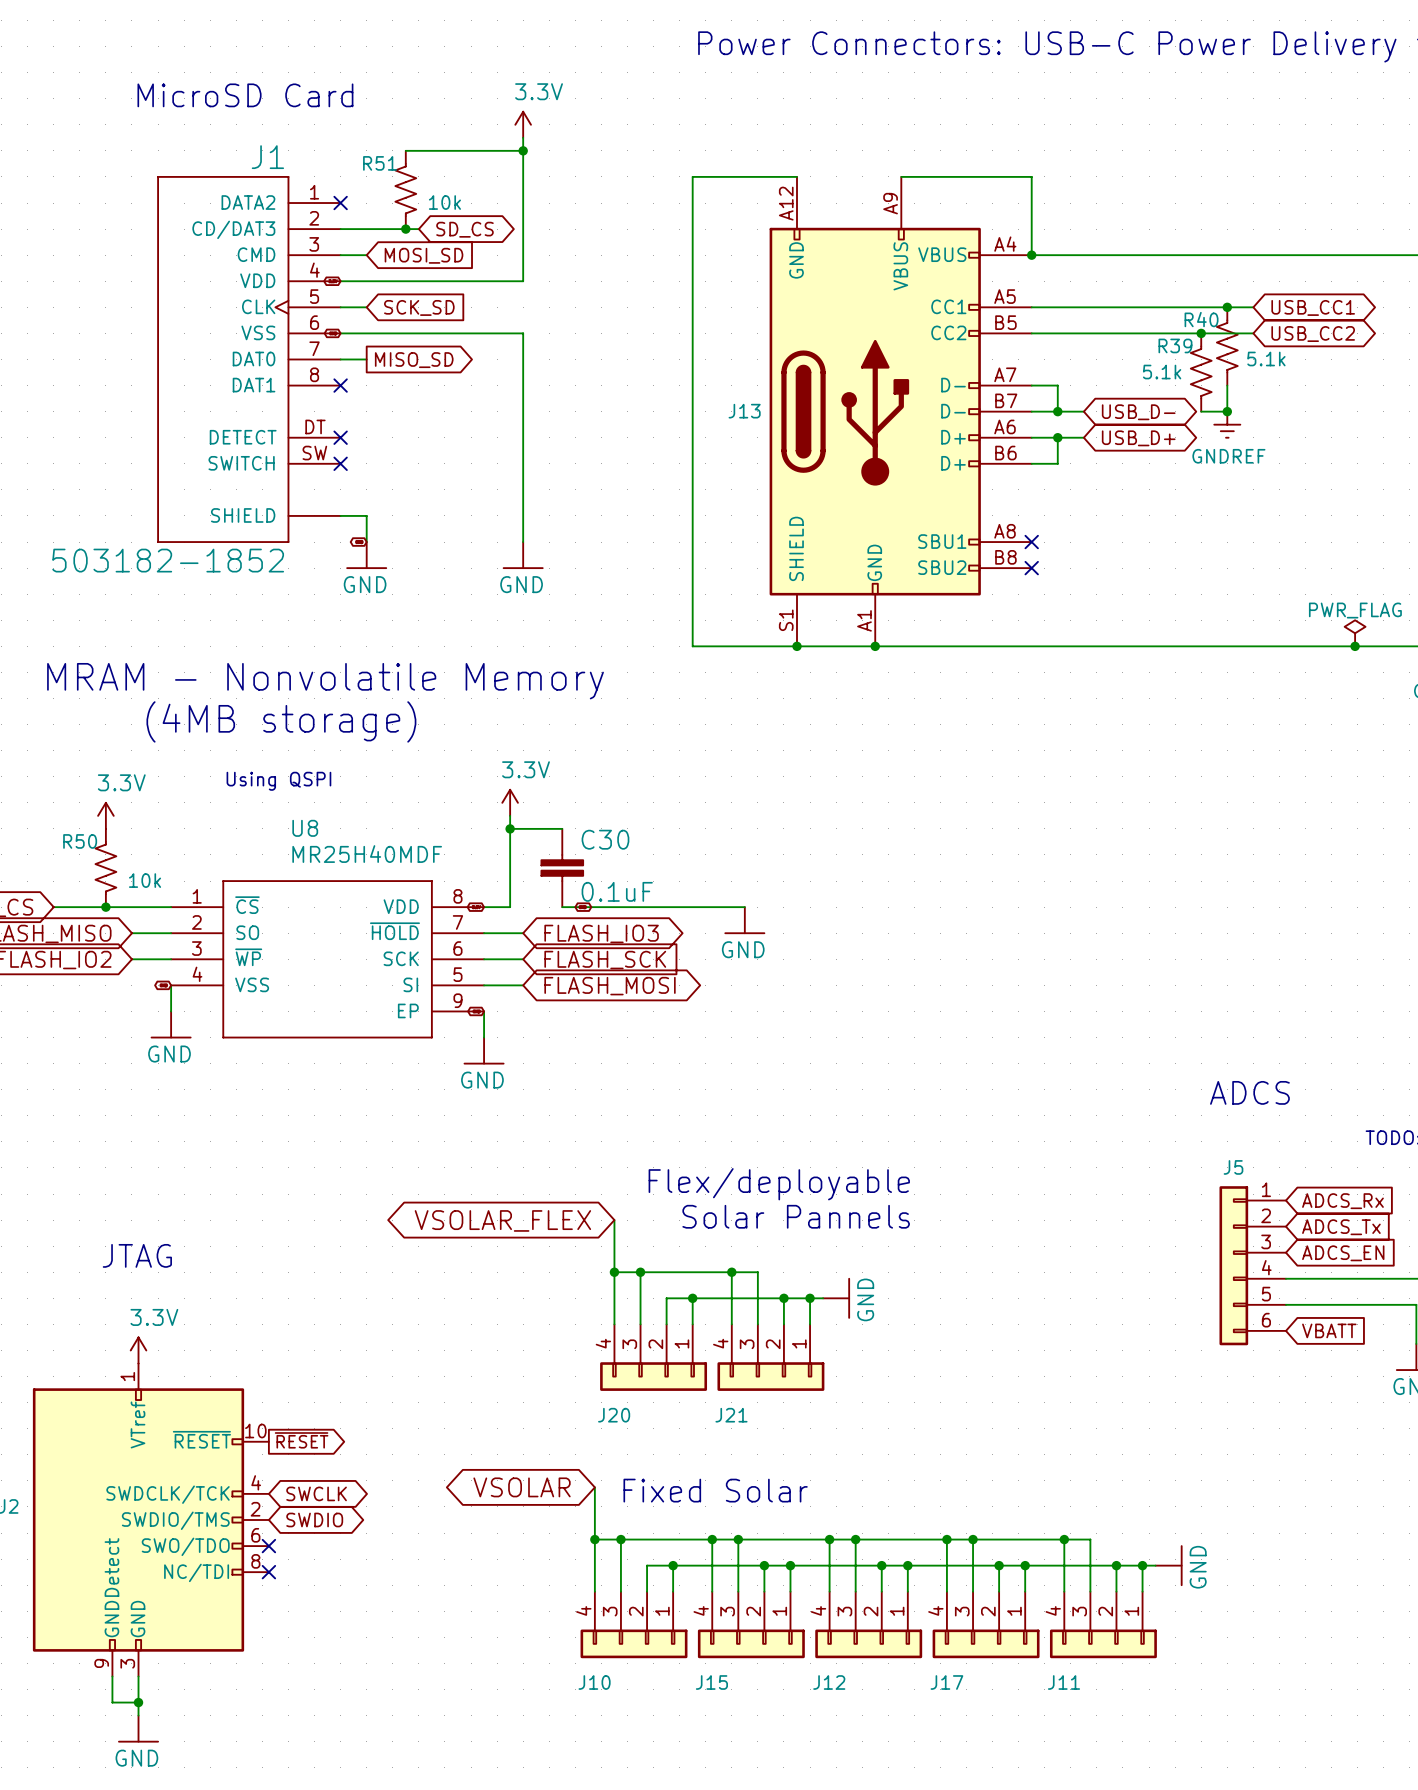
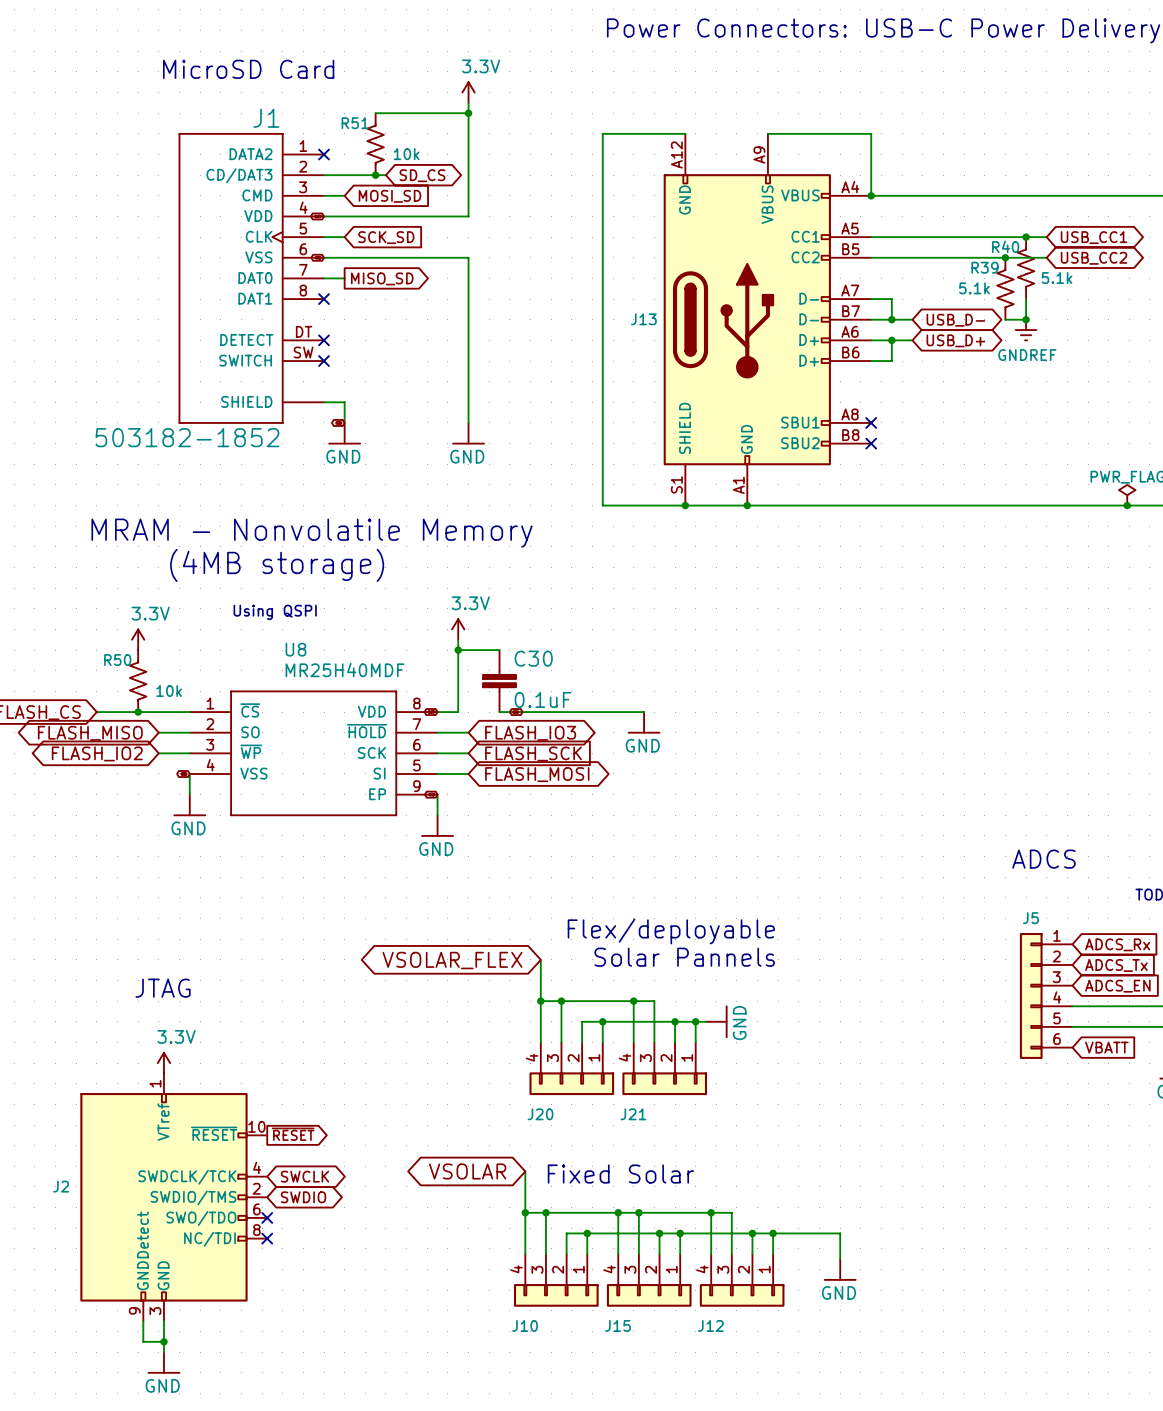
wire: (855, 1539) (1090, 1539) (1090, 1591) -> none
junction: (855, 1539) -> none
wire: (946, 1539) (946, 1591) -> none
junction: (946, 1539) -> none
wire: (973, 1539) (973, 1591) -> none
junction: (973, 1539) -> none
wire: (1064, 1539) (1064, 1591) -> none
junction: (1064, 1539) -> none
wire: (992, 1565) (1155, 1565) -> (840, 1233) (840, 1259)
wire: (999, 1565) (999, 1591) -> none
junction: (999, 1565) -> none
wire: (1025, 1565) (1025, 1591) -> none
junction: (1025, 1565) -> none
wire: (1116, 1565) (1116, 1591) -> none
junction: (1116, 1565) -> none
wire: (1142, 1565) (1142, 1591) -> none
junction: (1142, 1565) -> none
power symbol position: GND (1168, 1565) -> GND (840, 1269)
power symbol rotation: 0° (1181, 1565) -> 90° clockwise (840, 1279)
J17: (986, 1624) -> none
J11: (1103, 1624) -> none

